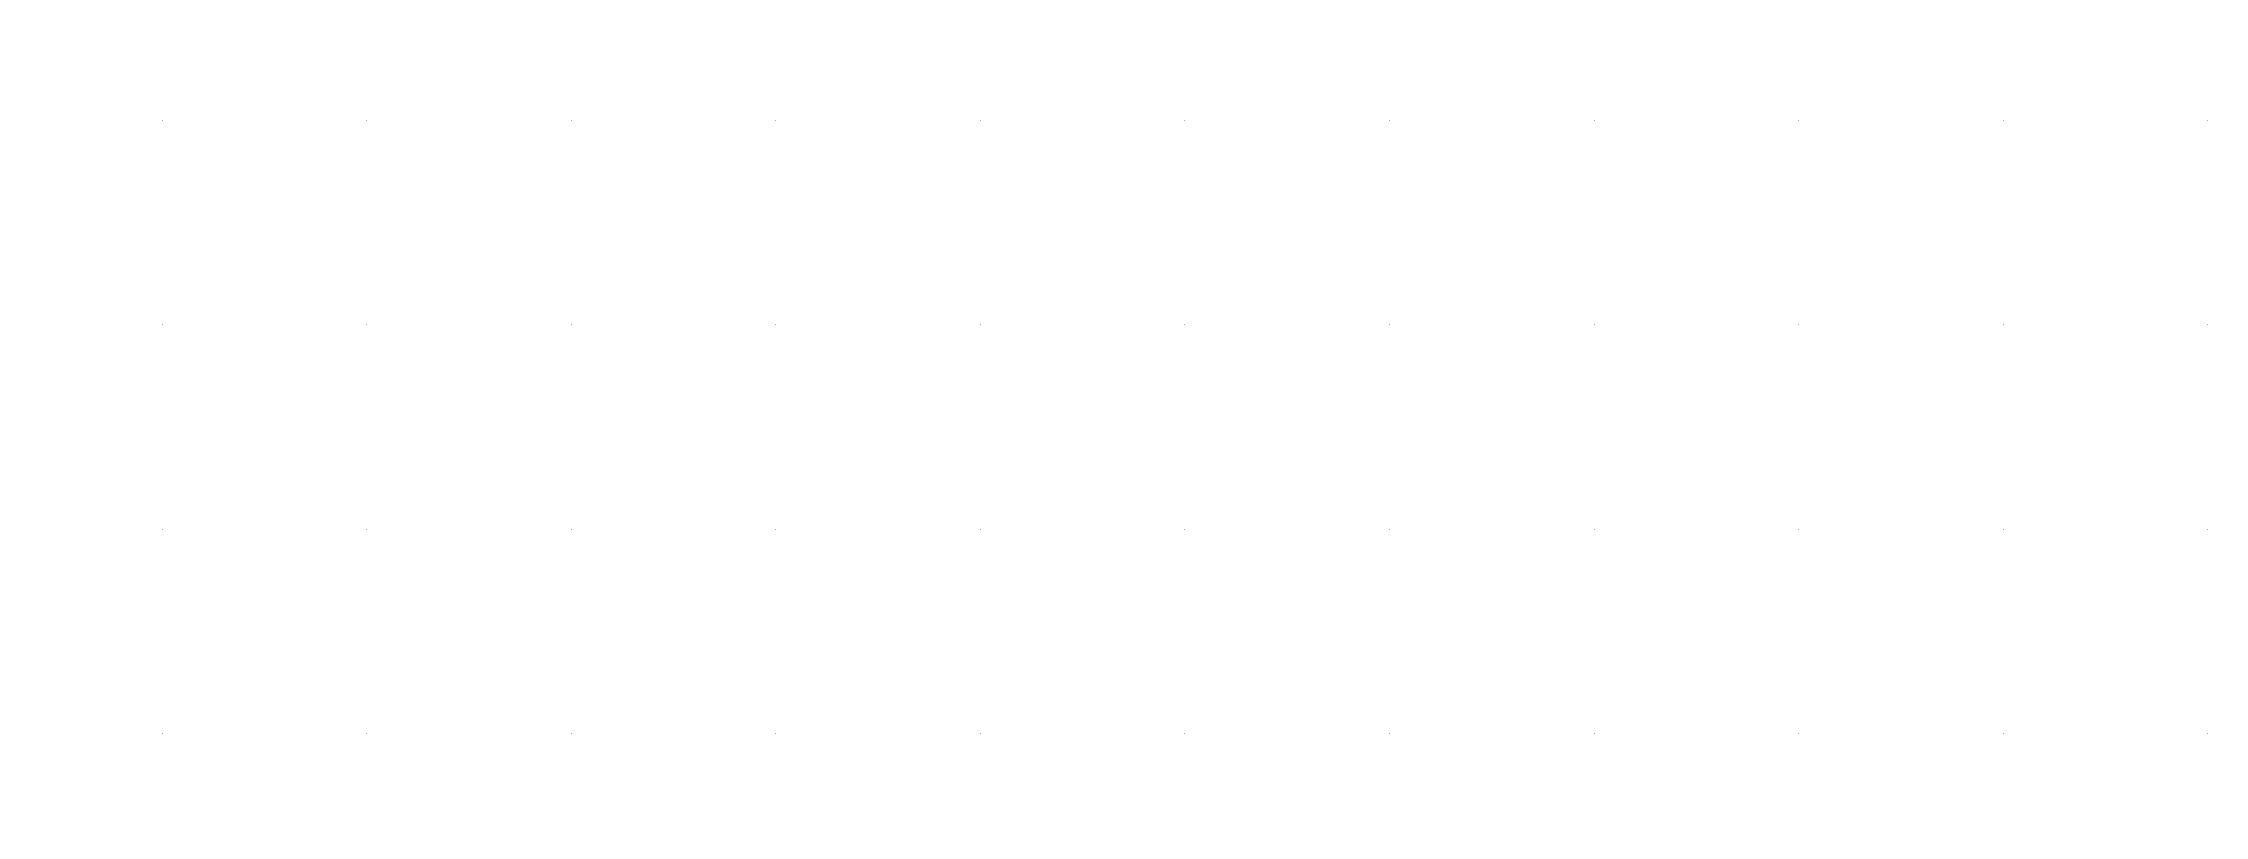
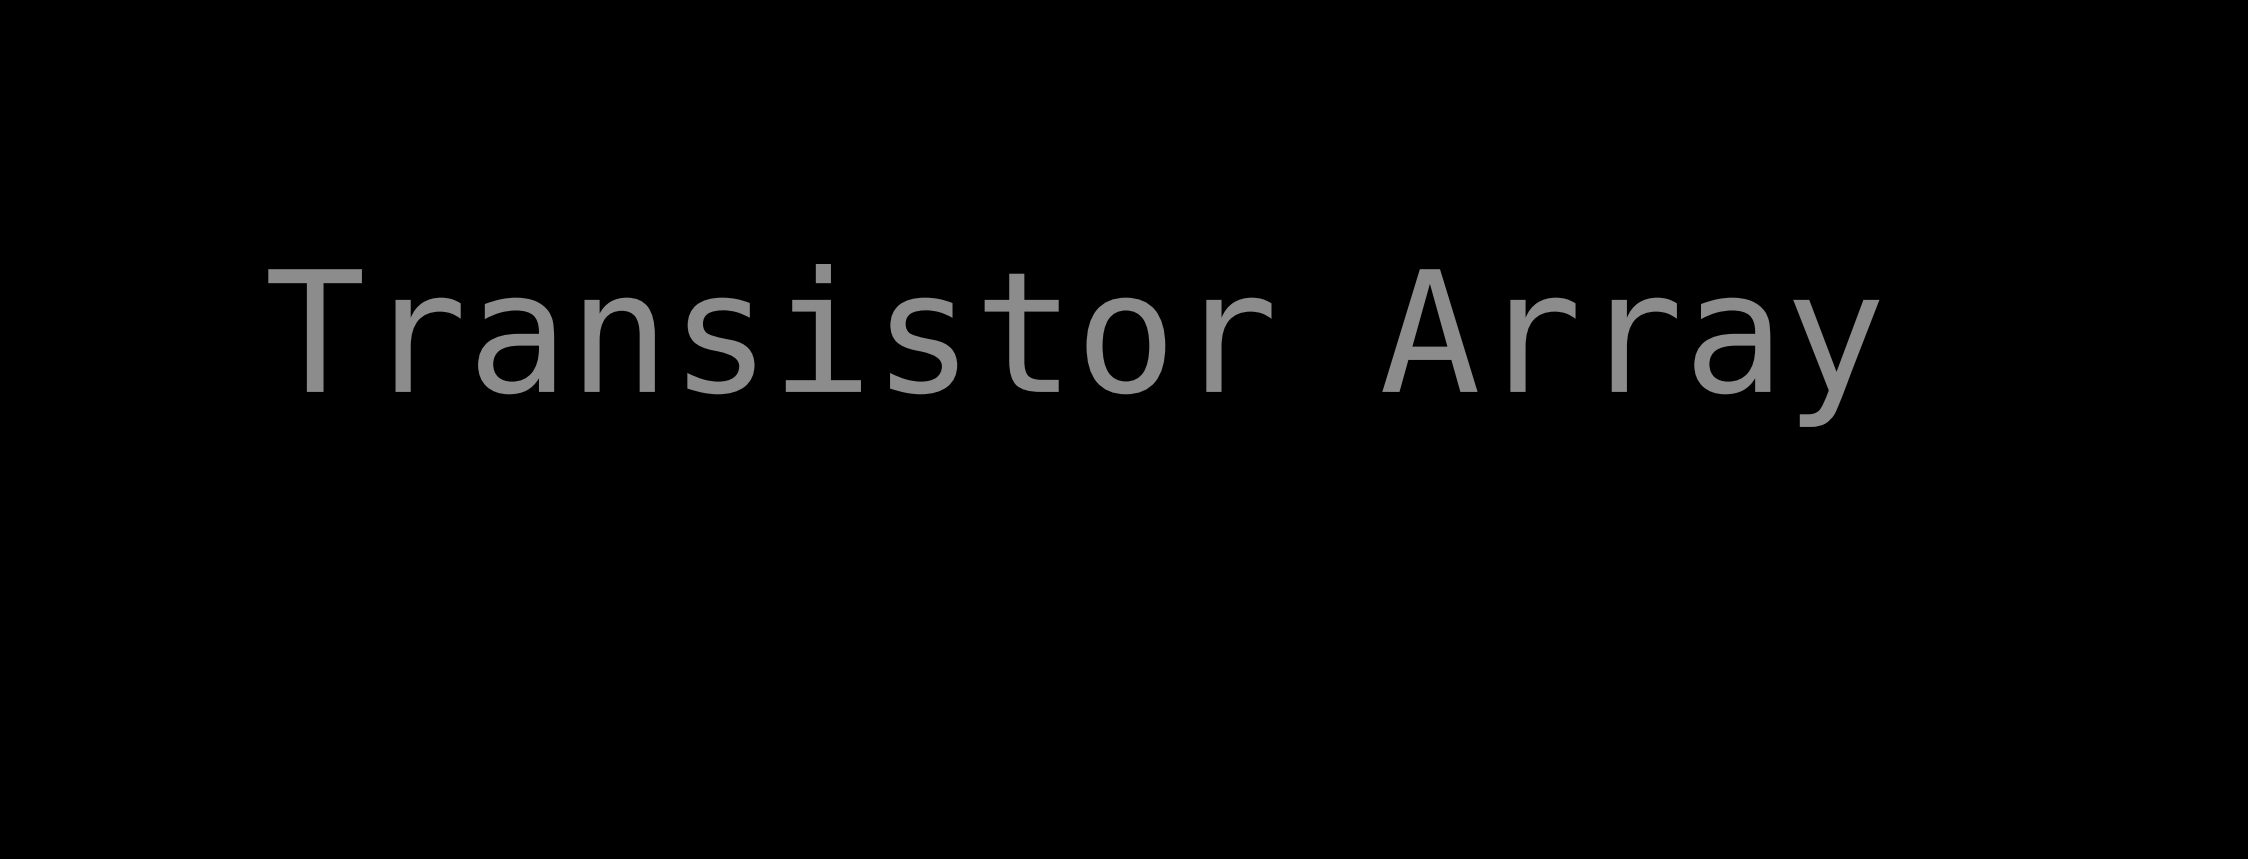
text: none -> Transistor Array (1073, 345)

